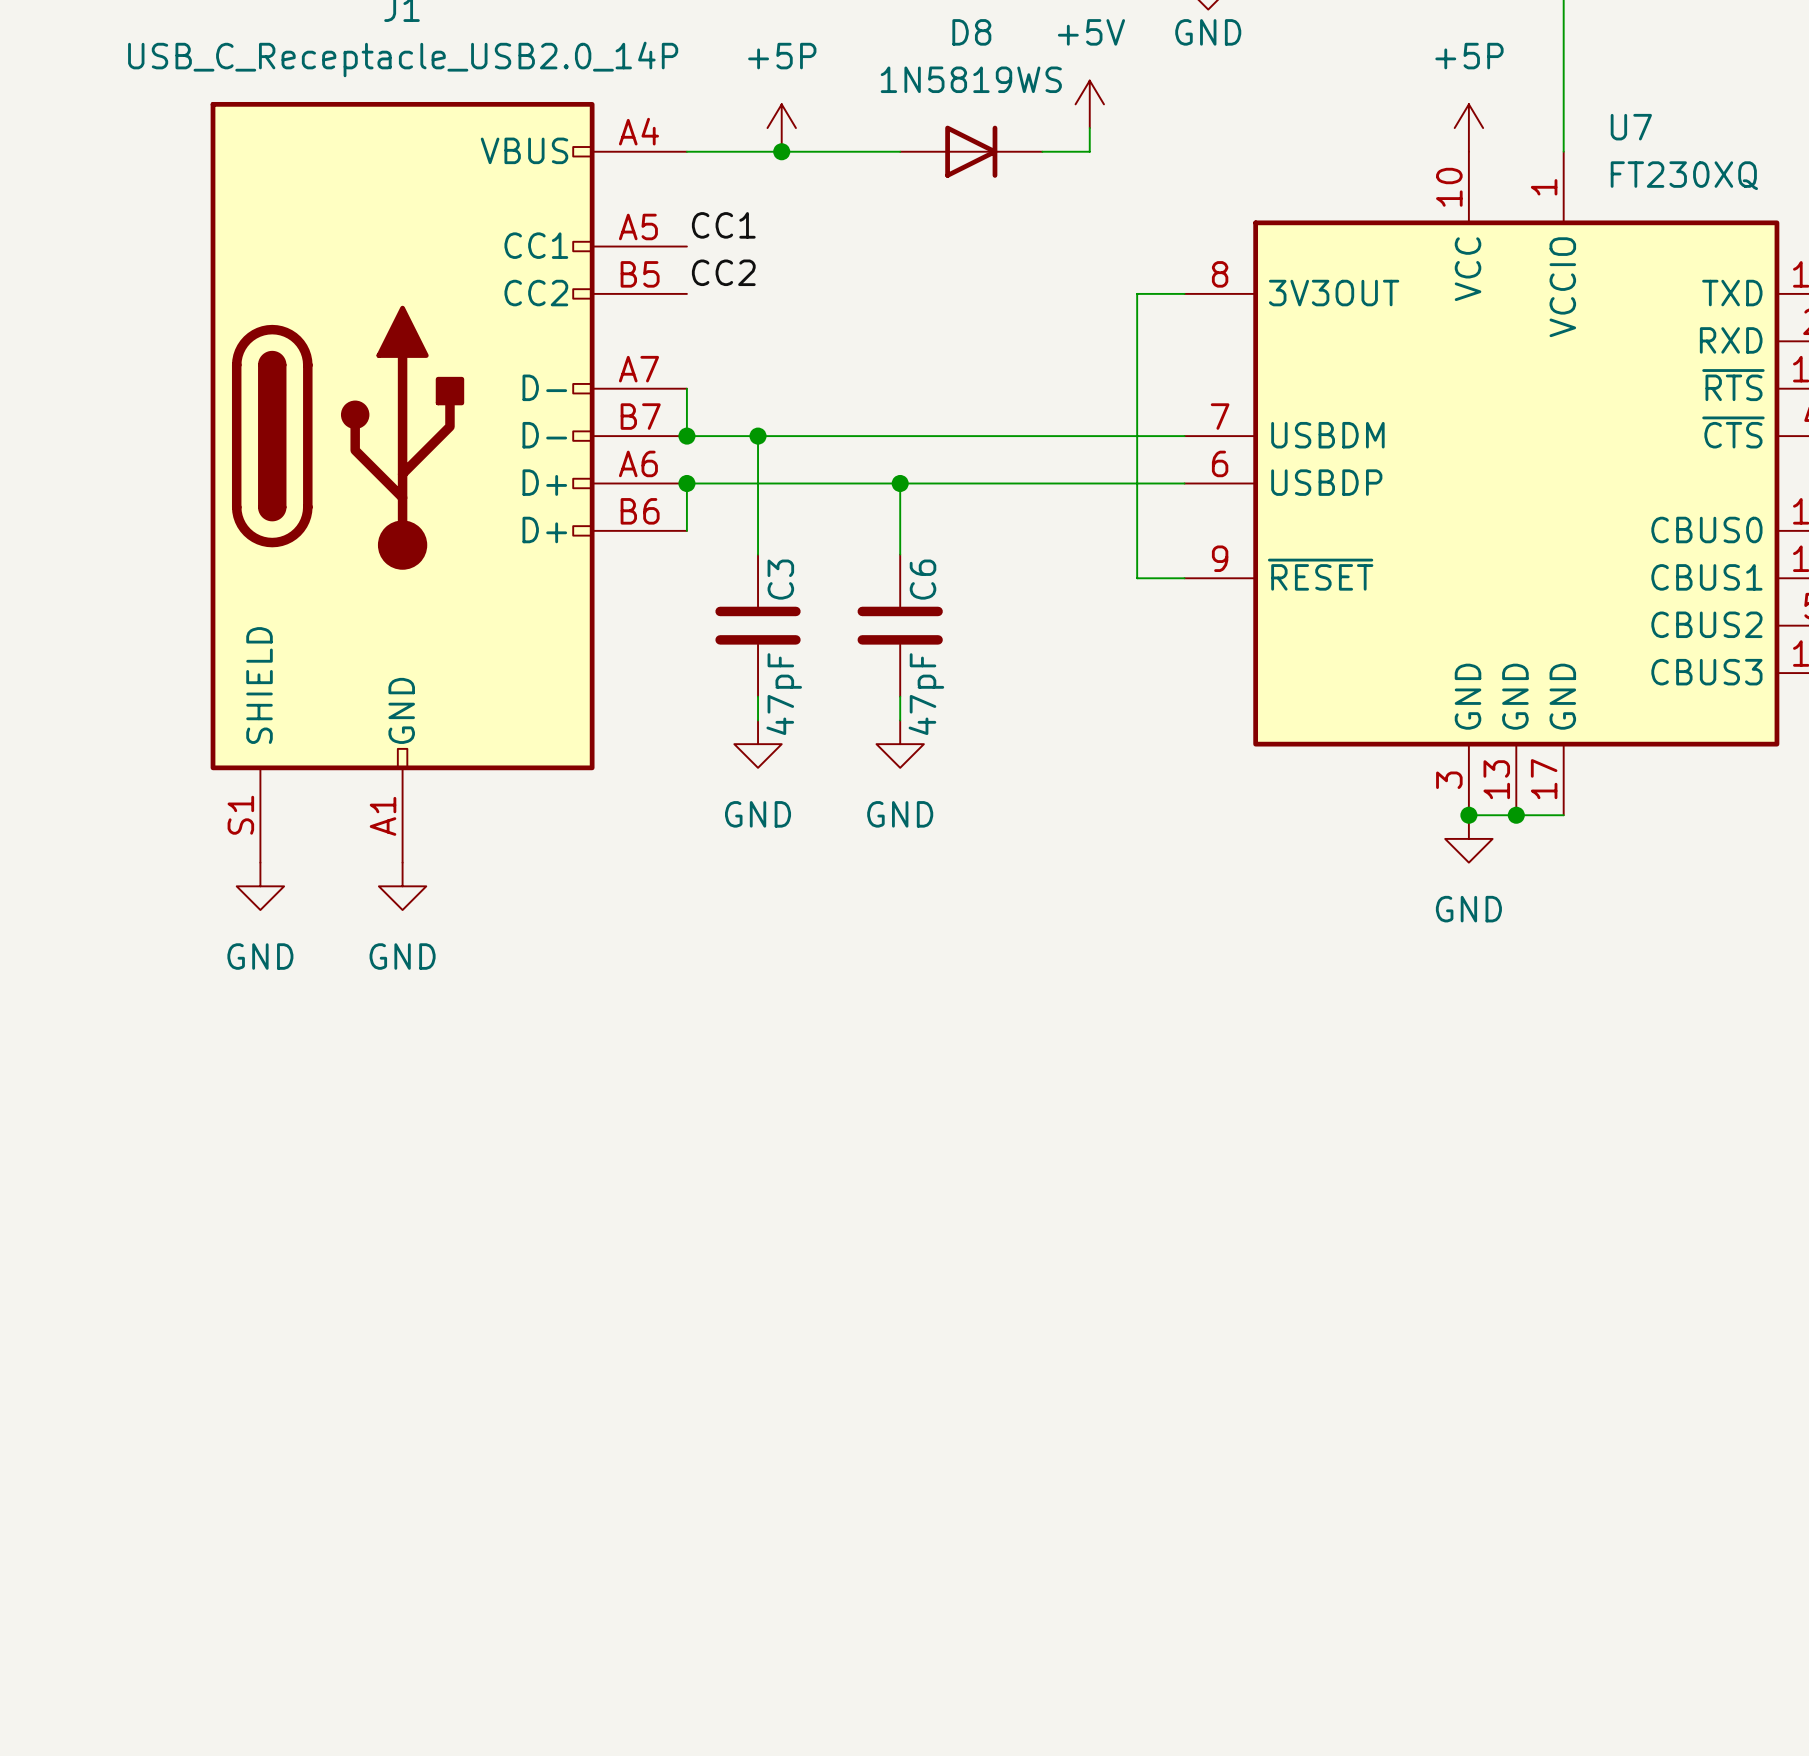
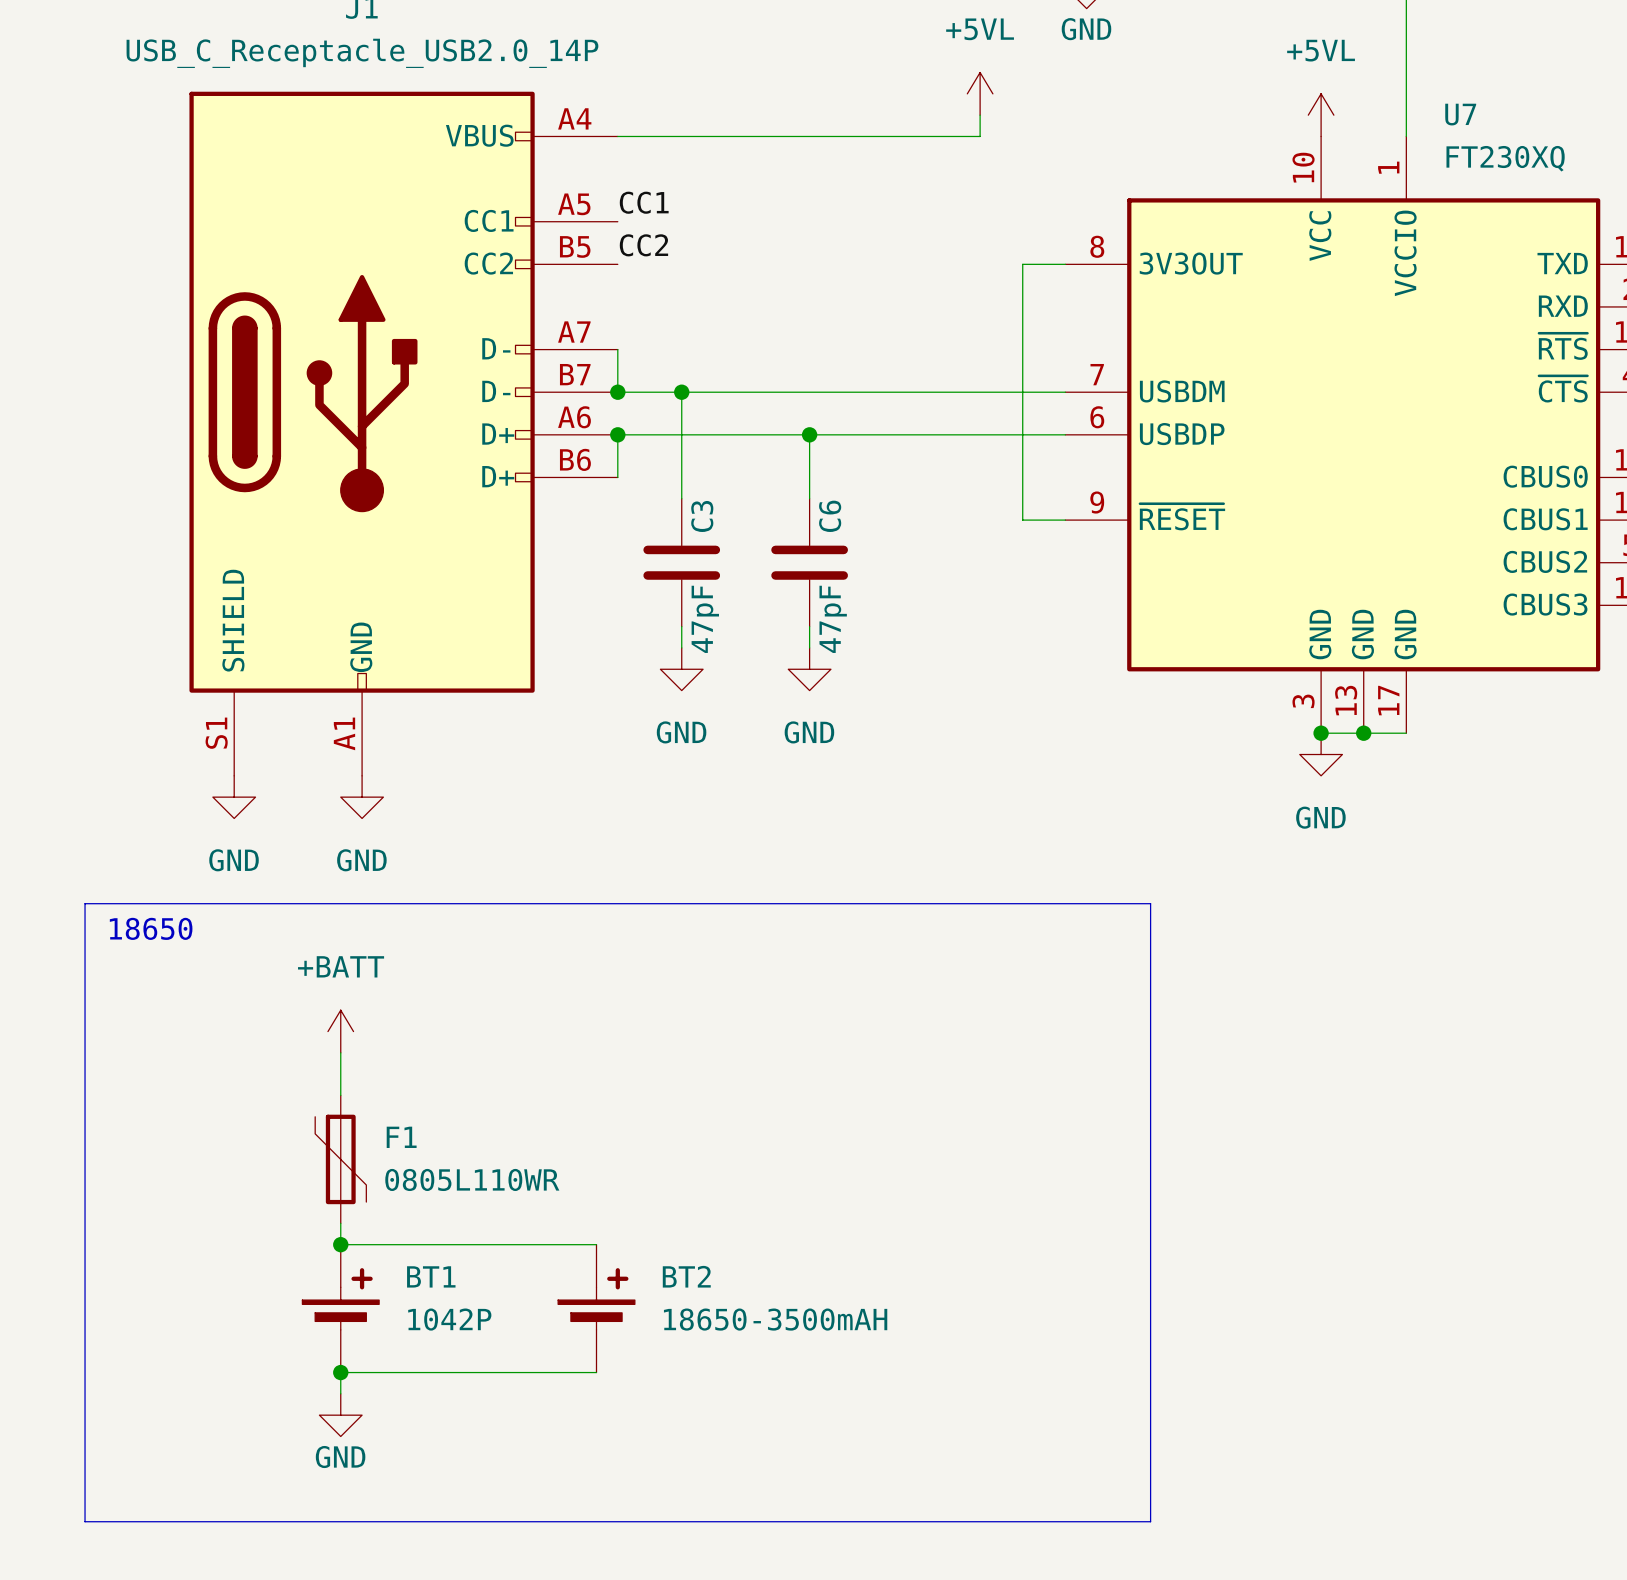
power symbol: +5V (1089, 104) -> +5VL (980, 93)
power symbol: +5P (781, 128) -> none
power symbol: +5P (1468, 128) -> +5VL (1321, 115)
junction: (781, 151) -> none
D8: 1N5819WS (971, 151) -> none
line: none -> (85, 903) (1150, 903) (1150, 1521) (85, 1521) (85, 903)
text: none -> 18650 (151, 928)
power symbol: none -> +BATT (340, 1031)
wire: none -> (340, 1052) (340, 1095)
F1: none -> 0805L110WR (340, 1159)
wire: none -> (340, 1223) (340, 1244) (596, 1244)
junction: none -> (340, 1244)
BT1: none -> 1042P (340, 1308)
BT2: none -> 18650-3500mAH (596, 1308)
junction: none -> (340, 1372)
wire: none -> (596, 1372) (340, 1372) (340, 1393)
power symbol: none -> GND (340, 1415)

